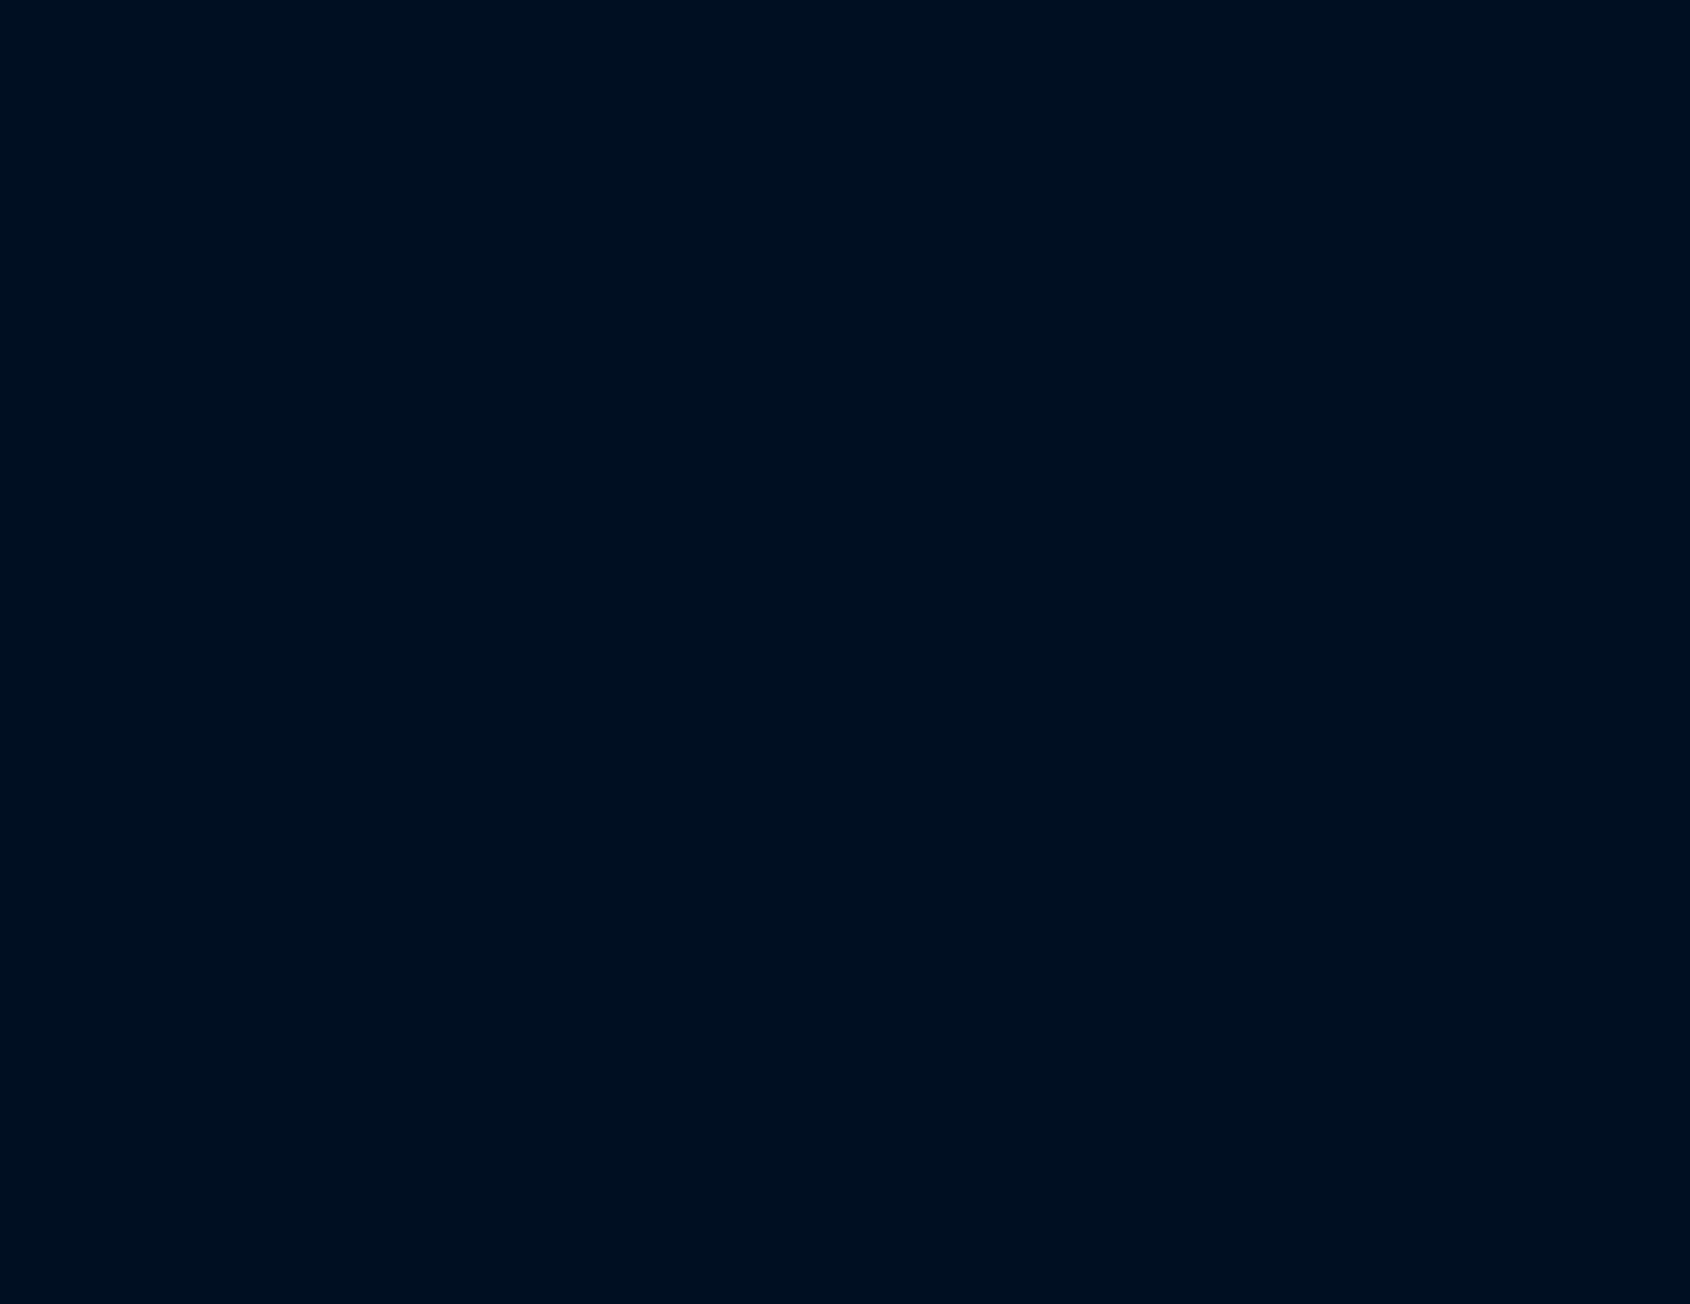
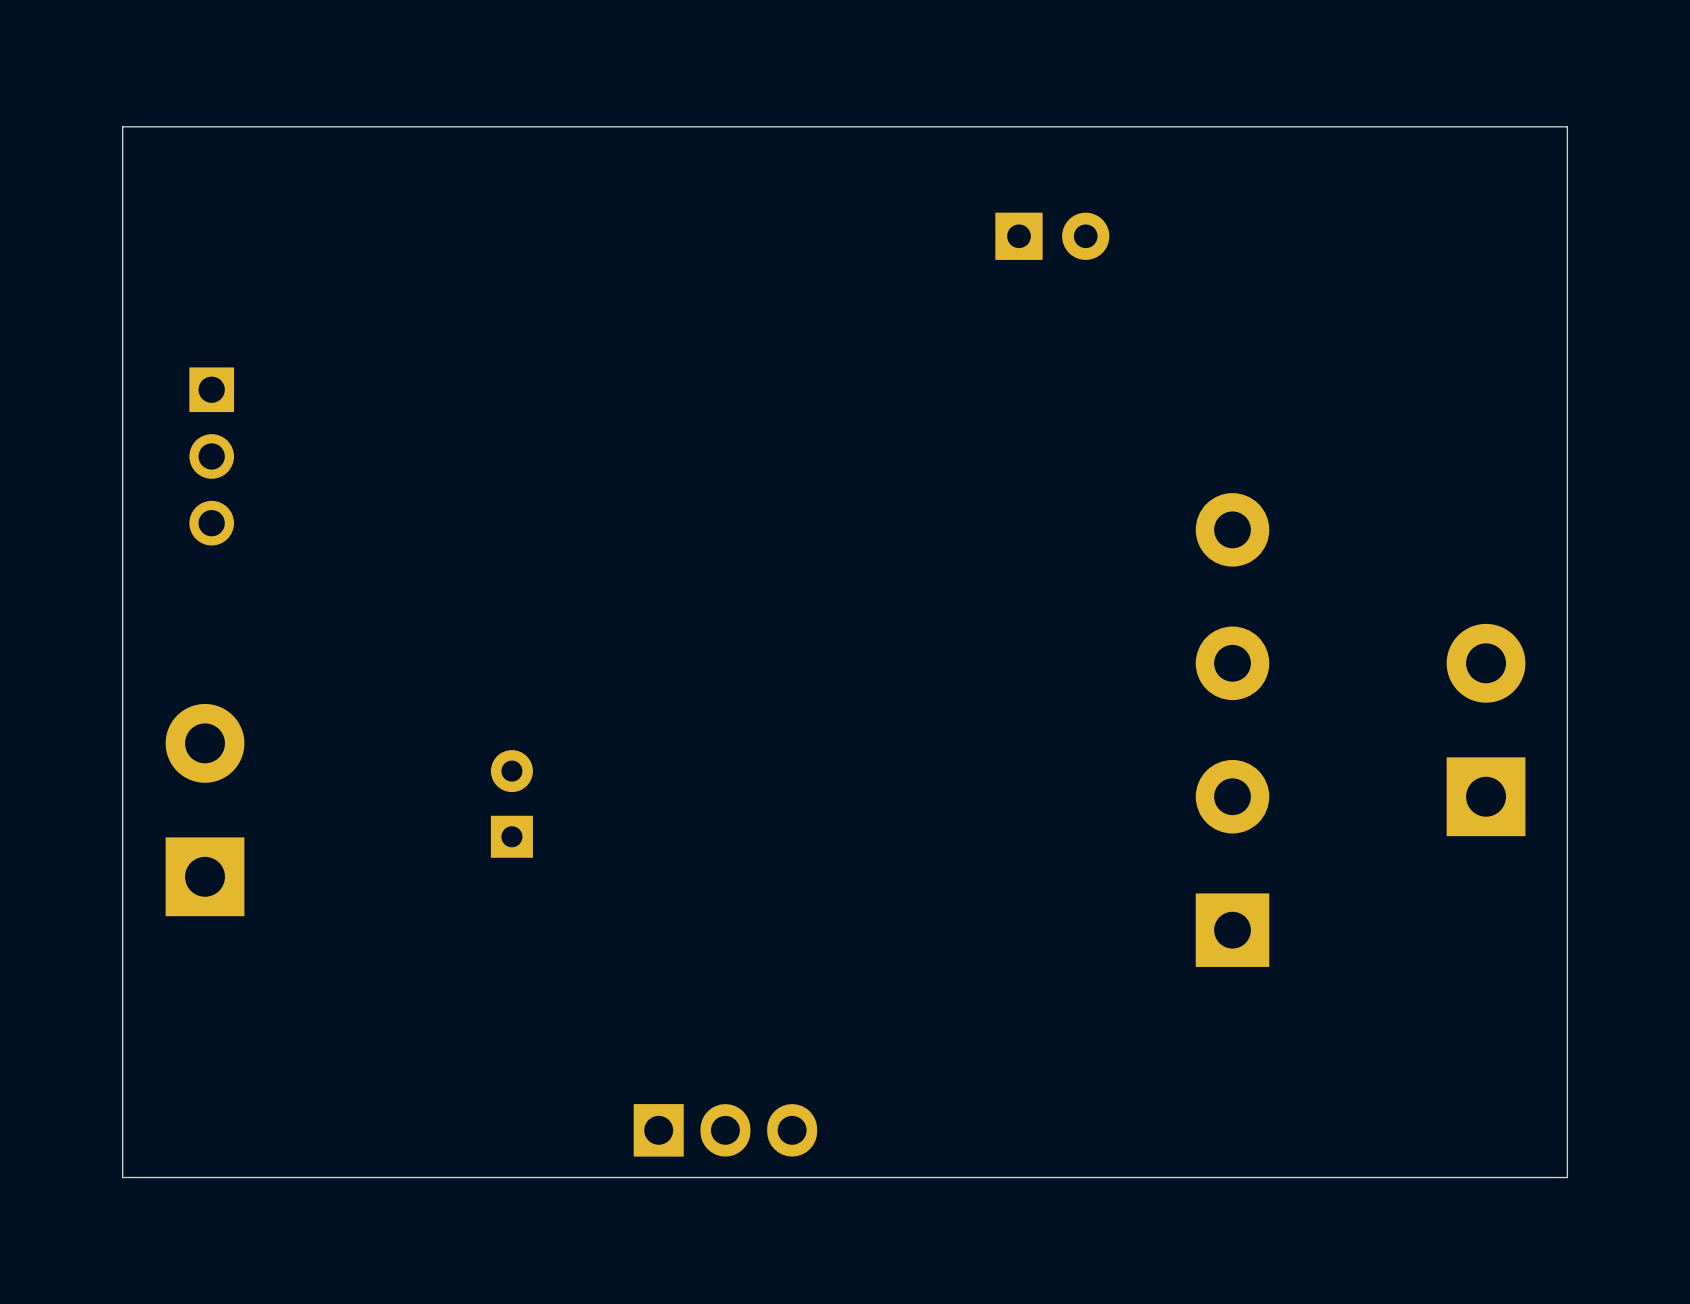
board edge: none -> (1567, 126) (122, 126) (122, 1177) (1567, 1177) (1567, 126)
part: none -> (1052, 236)
part: none -> (211, 456)
part: none -> (1232, 730)
part: none -> (1486, 730)
part: none -> (511, 803)
part: none -> (205, 810)
part: none -> (725, 1130)

